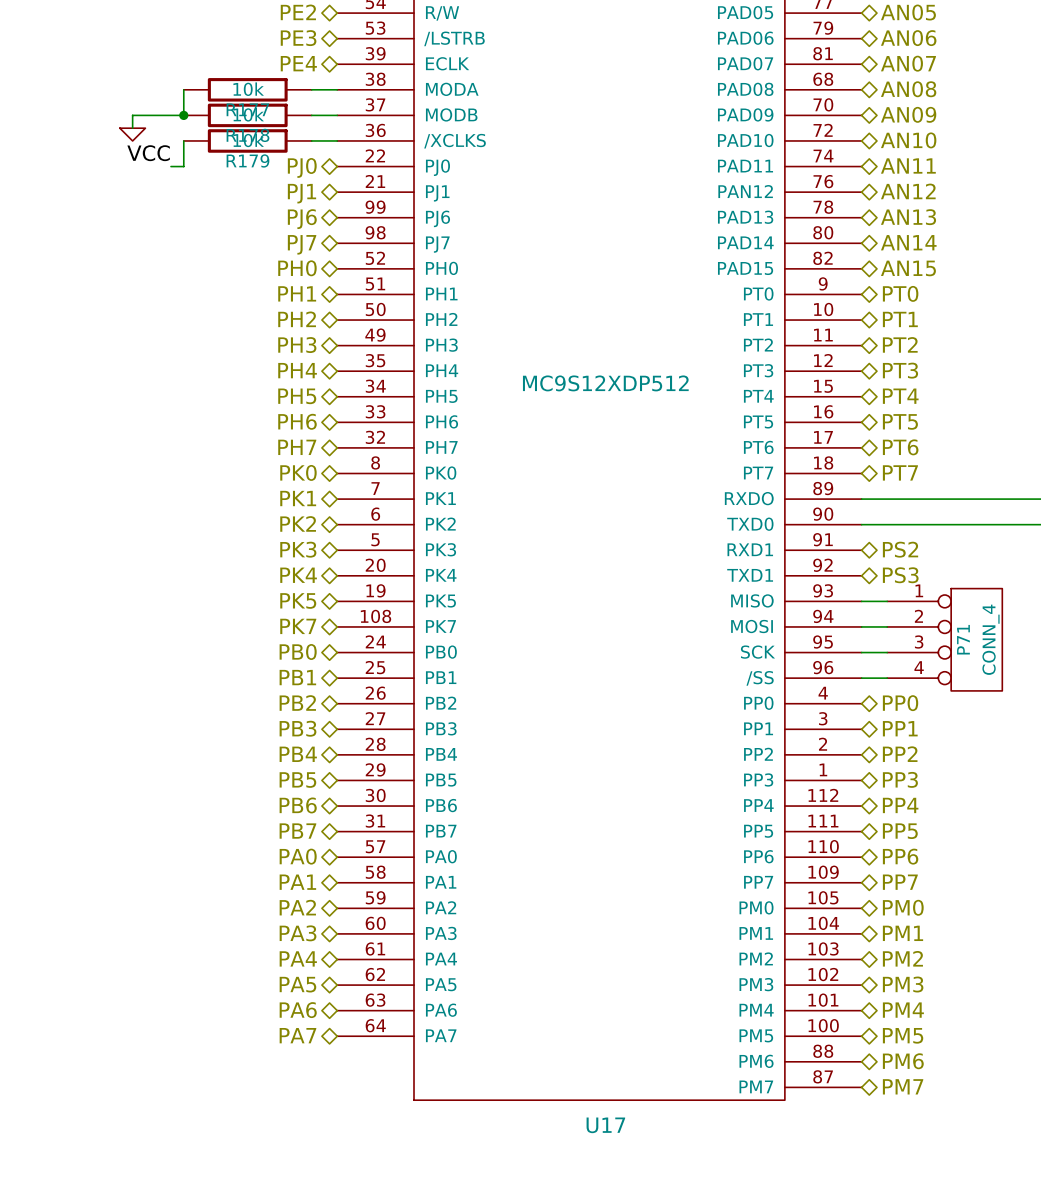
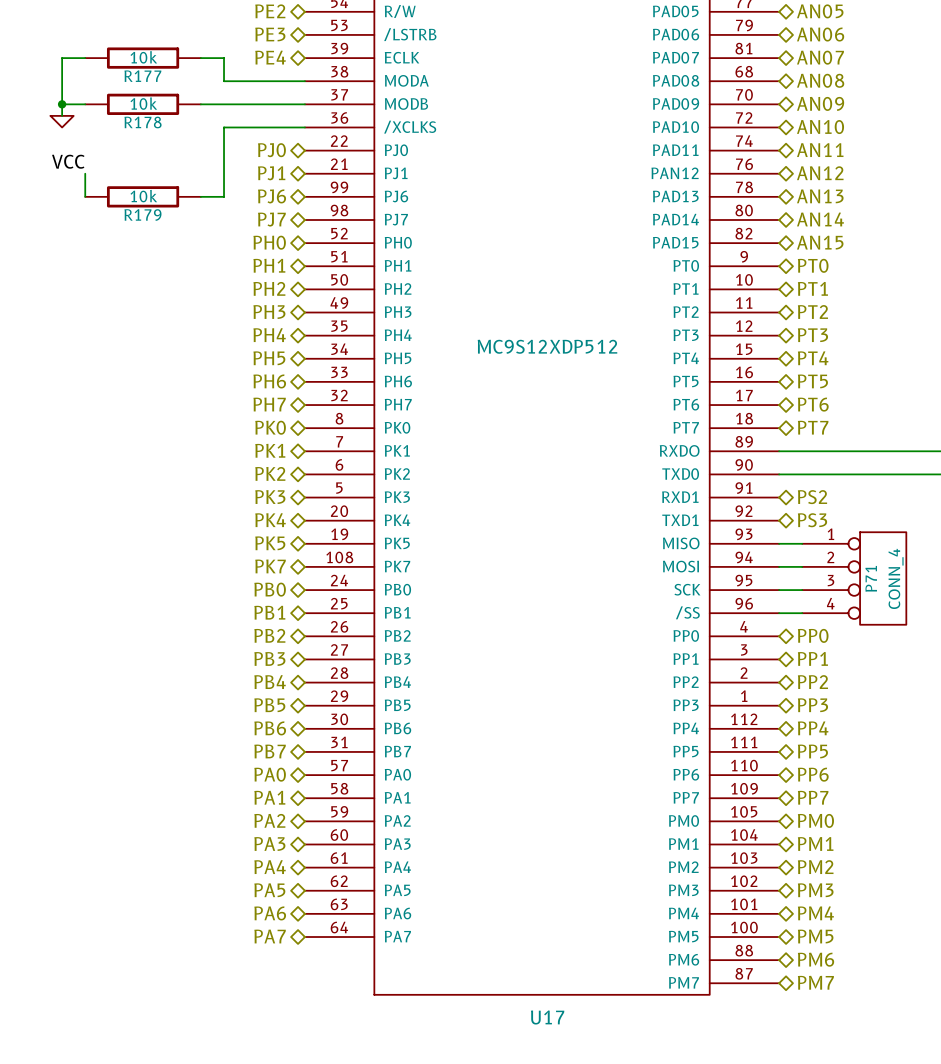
wire: none -> (85, 58) (62, 58) (62, 115)
wire: none -> (200, 58) (224, 58) (224, 81) (281, 81)
wire: (183, 89) (183, 115) (132, 115) (132, 128) -> none
R177 position: (247, 89) -> (143, 58)
wire: none -> (62, 104) (85, 104)
junction: none -> (62, 104)
junction: (183, 115) -> none
wire: none -> (200, 104) (281, 104)
R178 position: (247, 115) -> (143, 104)
power symbol position: (132, 134) -> (62, 121)
wire: (183, 140) (183, 166) (171, 166) -> none
R179 position: (247, 140) -> (143, 196)
wire: none -> (281, 127) (224, 127) (224, 196) (200, 196)
label position: VCC (148, 153) -> VCC (68, 161)
wire: none -> (85, 173) (85, 196)

